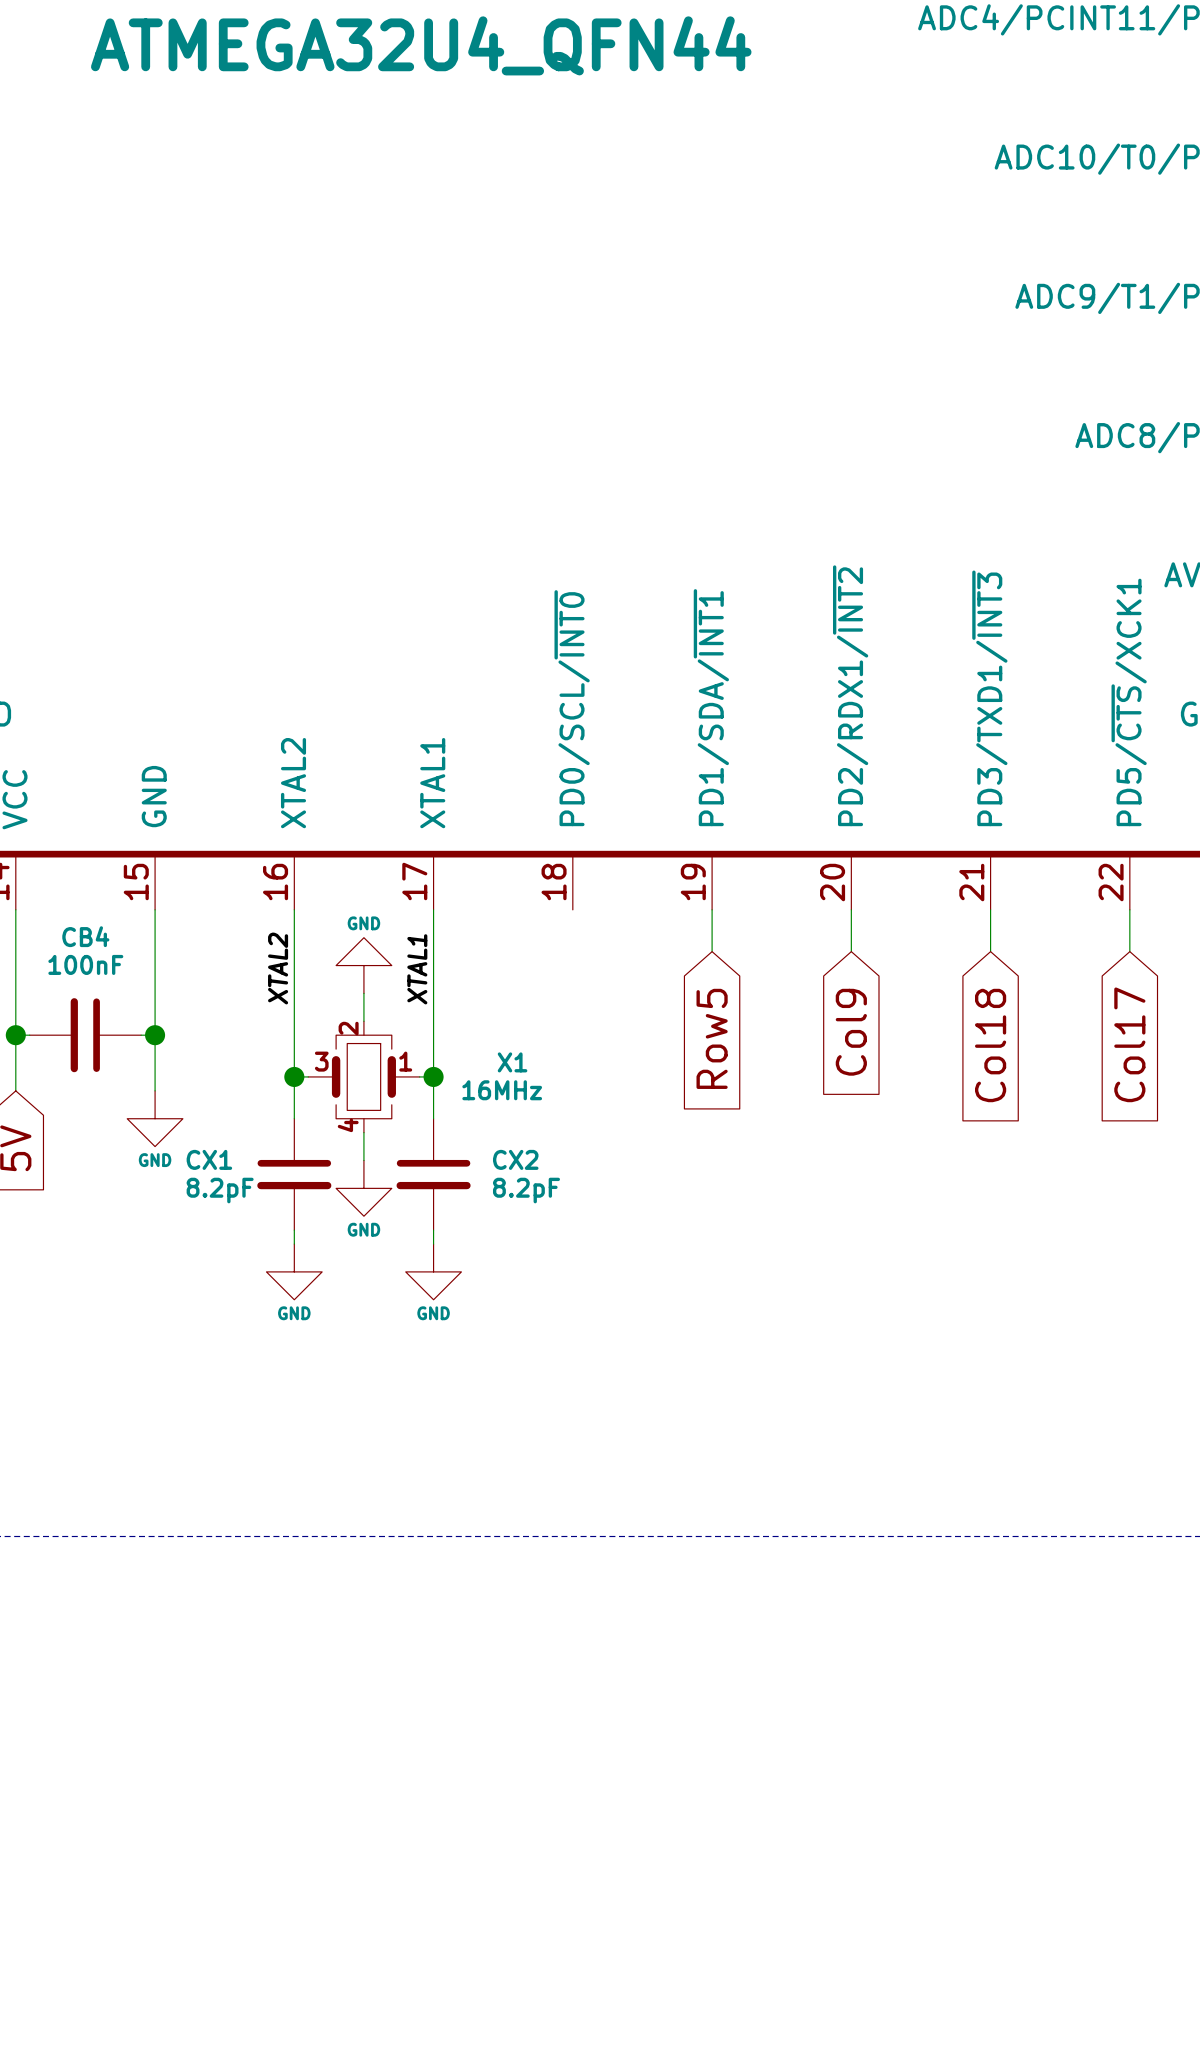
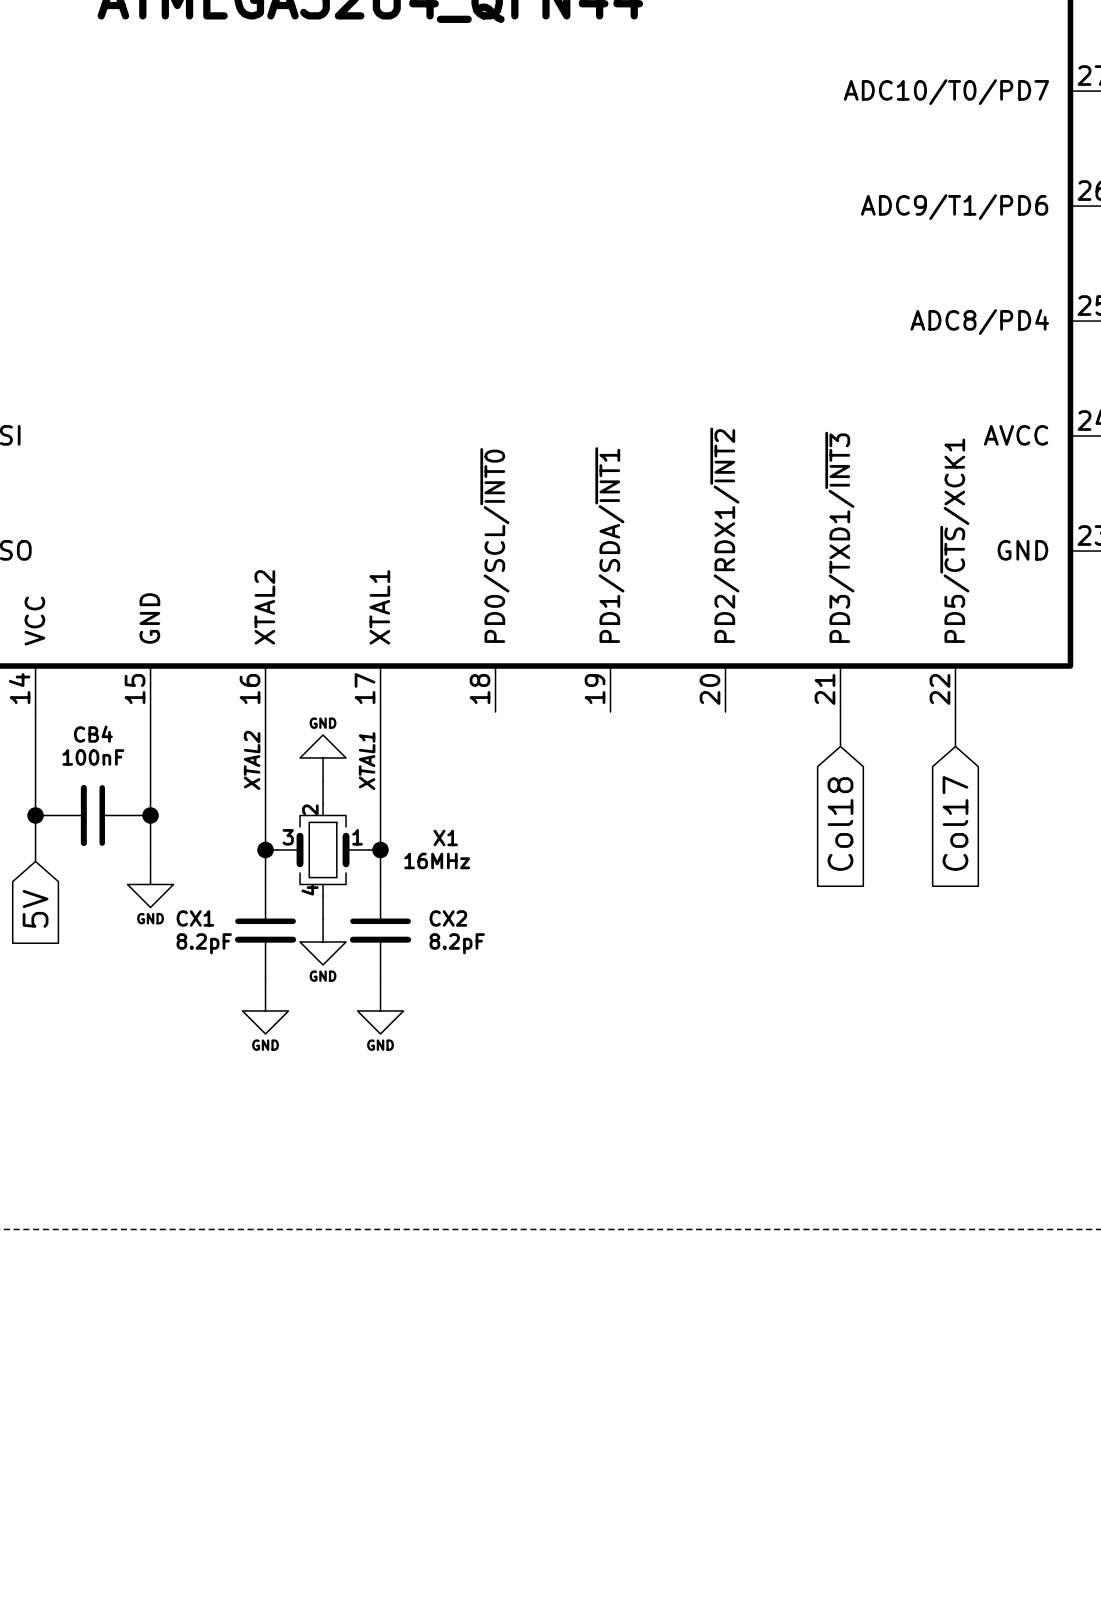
wire: (712, 909) (712, 951) -> none
wire: (851, 909) (851, 951) -> none
global label: Col9 (851, 1032) -> none
global label: Row5 (712, 1038) -> none

